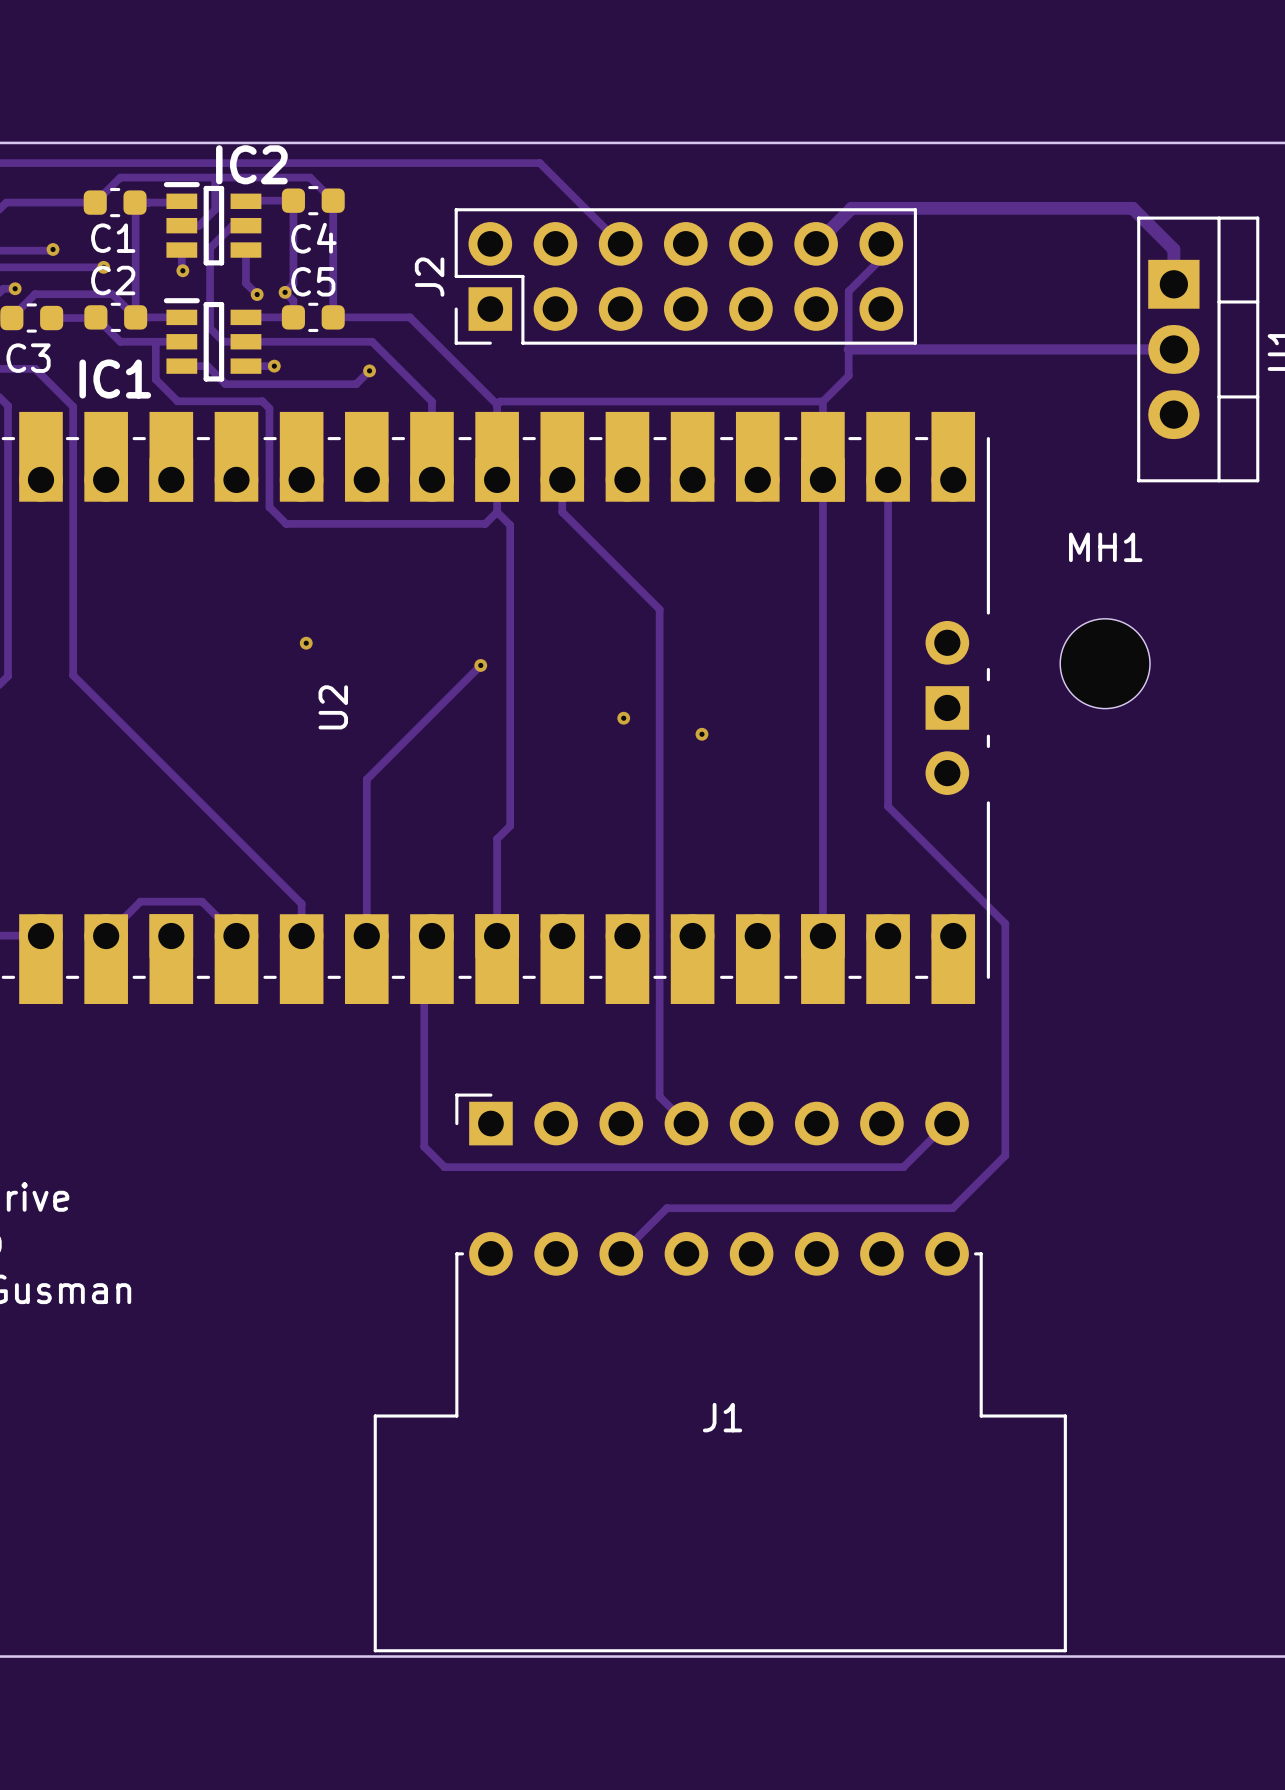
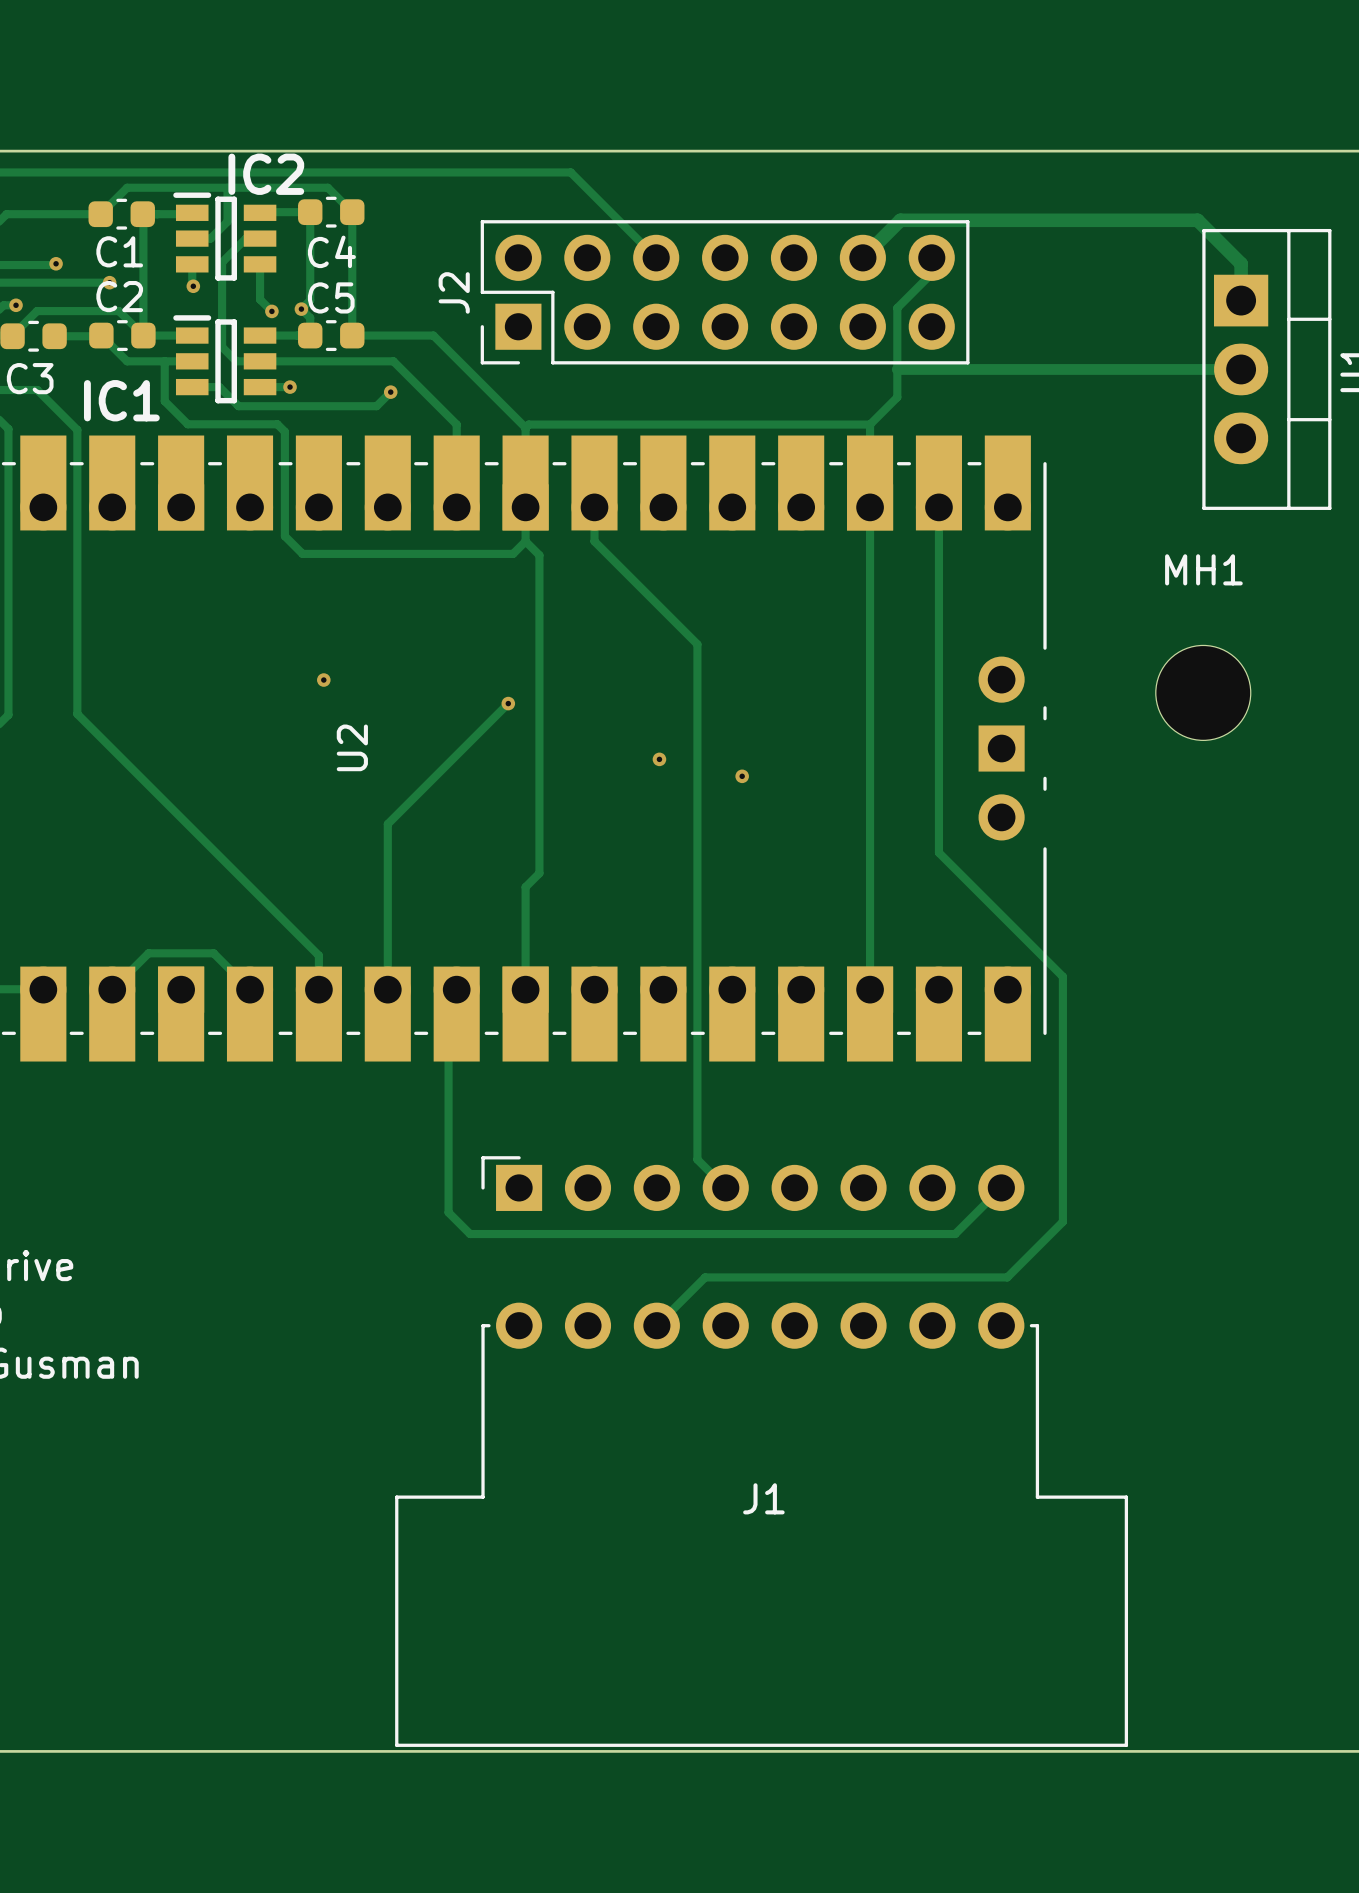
MH1 position: (1105, 663) -> (1203, 692)

